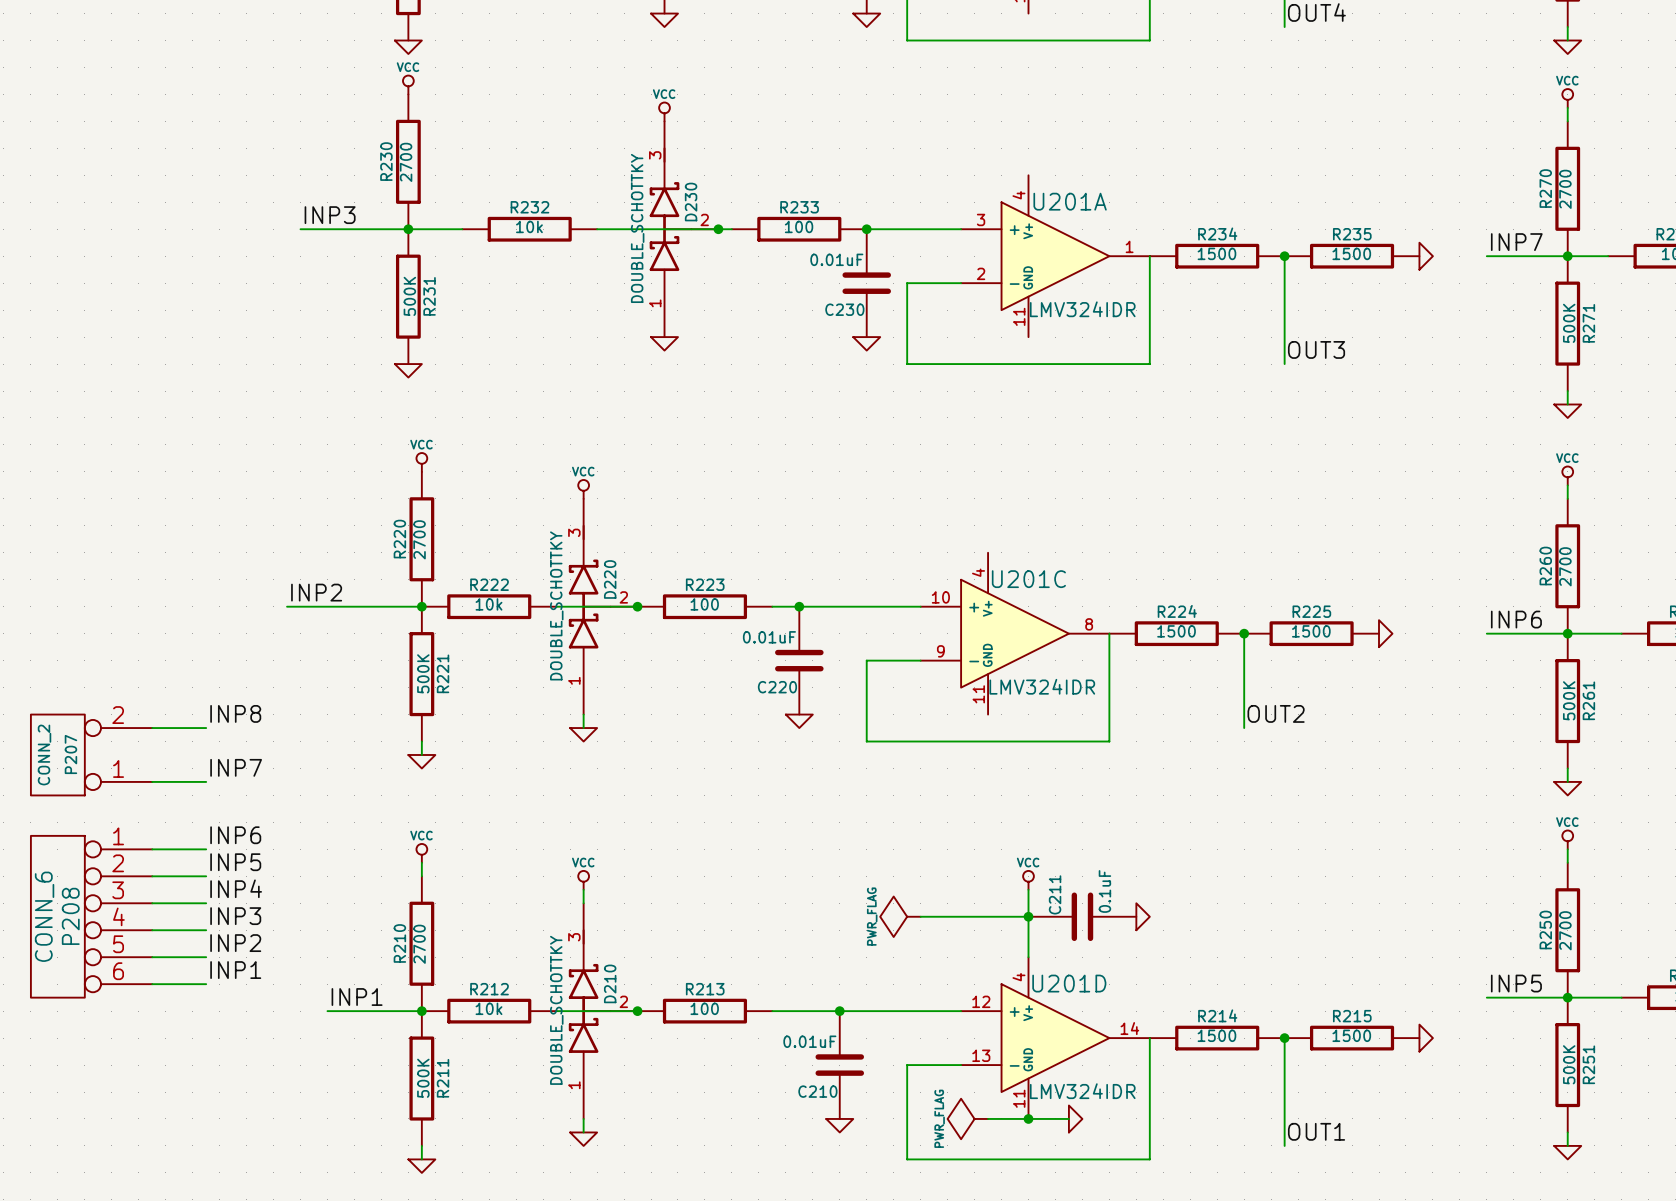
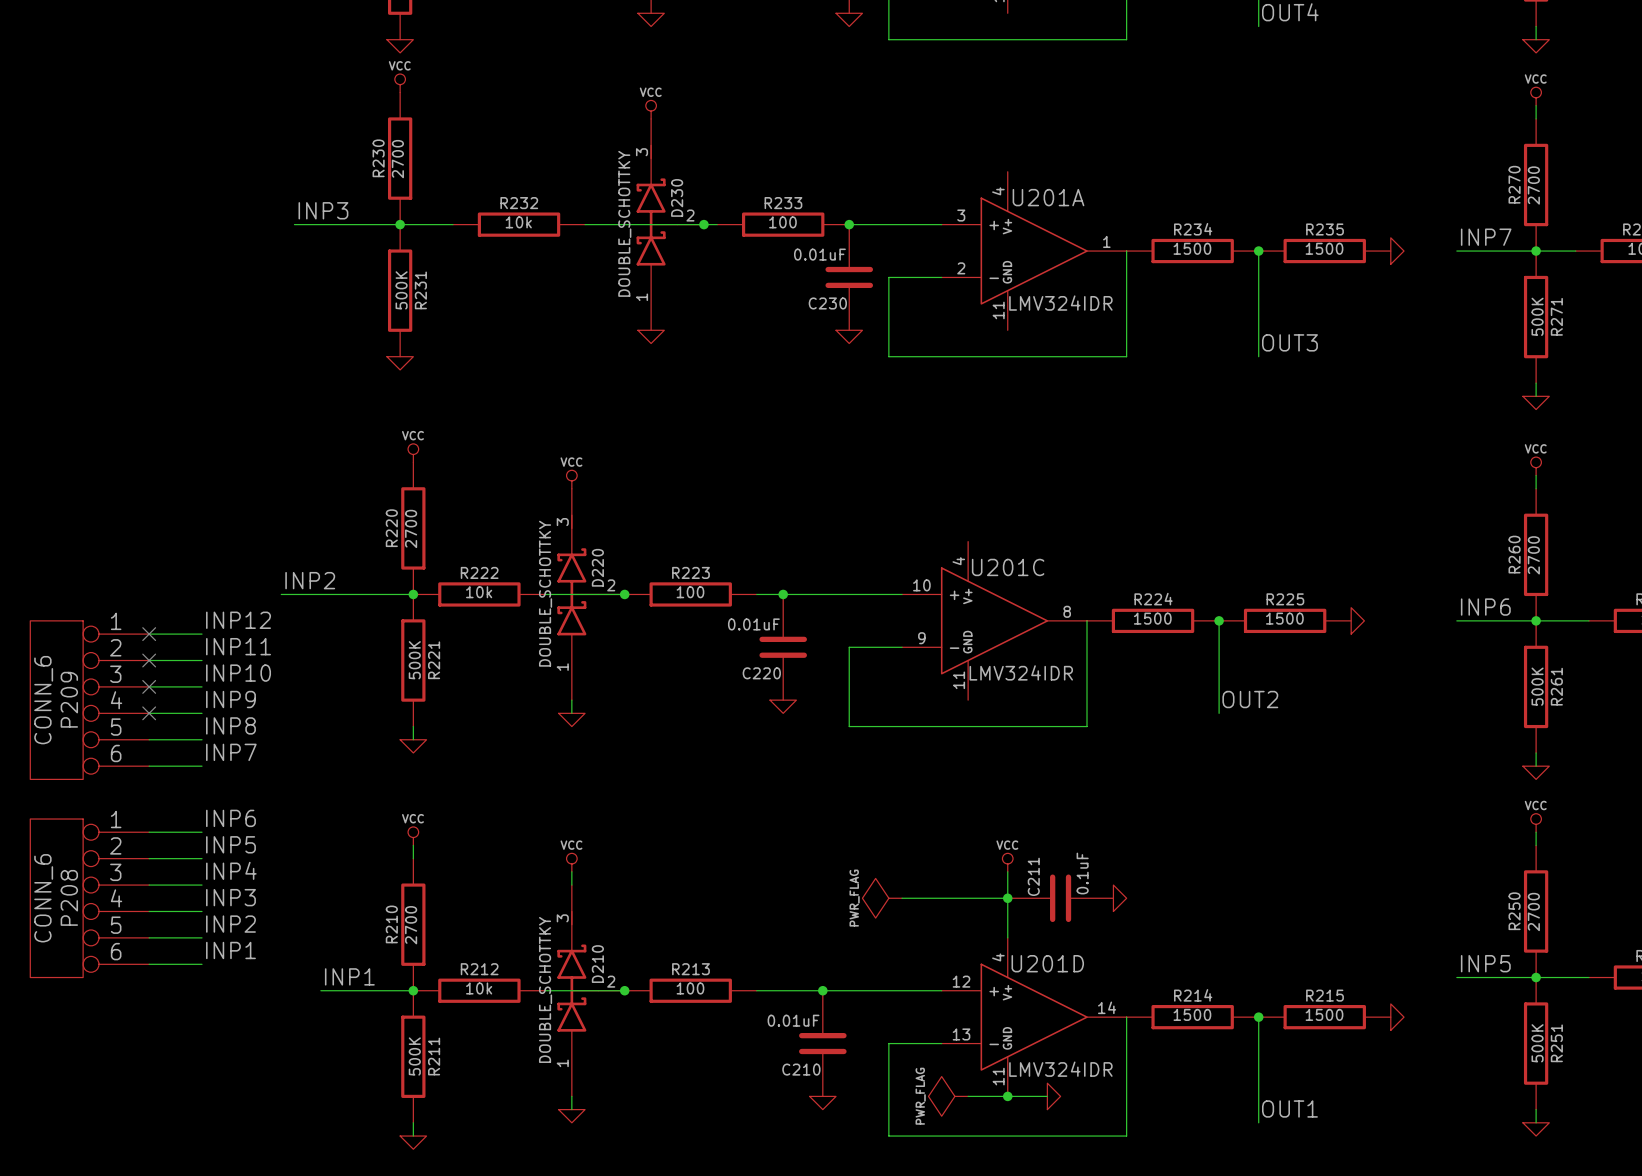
label: none -> INP12 (238, 620)
wire: none -> (149, 634) (202, 634)
no-connect mark: none -> (149, 634)
label: none -> INP11 (238, 646)
wire: none -> (149, 660) (202, 660)
no-connect mark: none -> (149, 660)
label: none -> INP10 (238, 673)
wire: none -> (149, 686) (202, 686)
no-connect mark: none -> (149, 686)
label: INP8 (235, 713) -> INP9 (230, 699)
P209: none -> CONN_6 (89, 700)
no-connect mark: none -> (149, 713)
label: none -> INP8 (230, 725)
P207: CONN_2 (91, 754) -> none
wire: none -> (149, 739) (202, 739)

